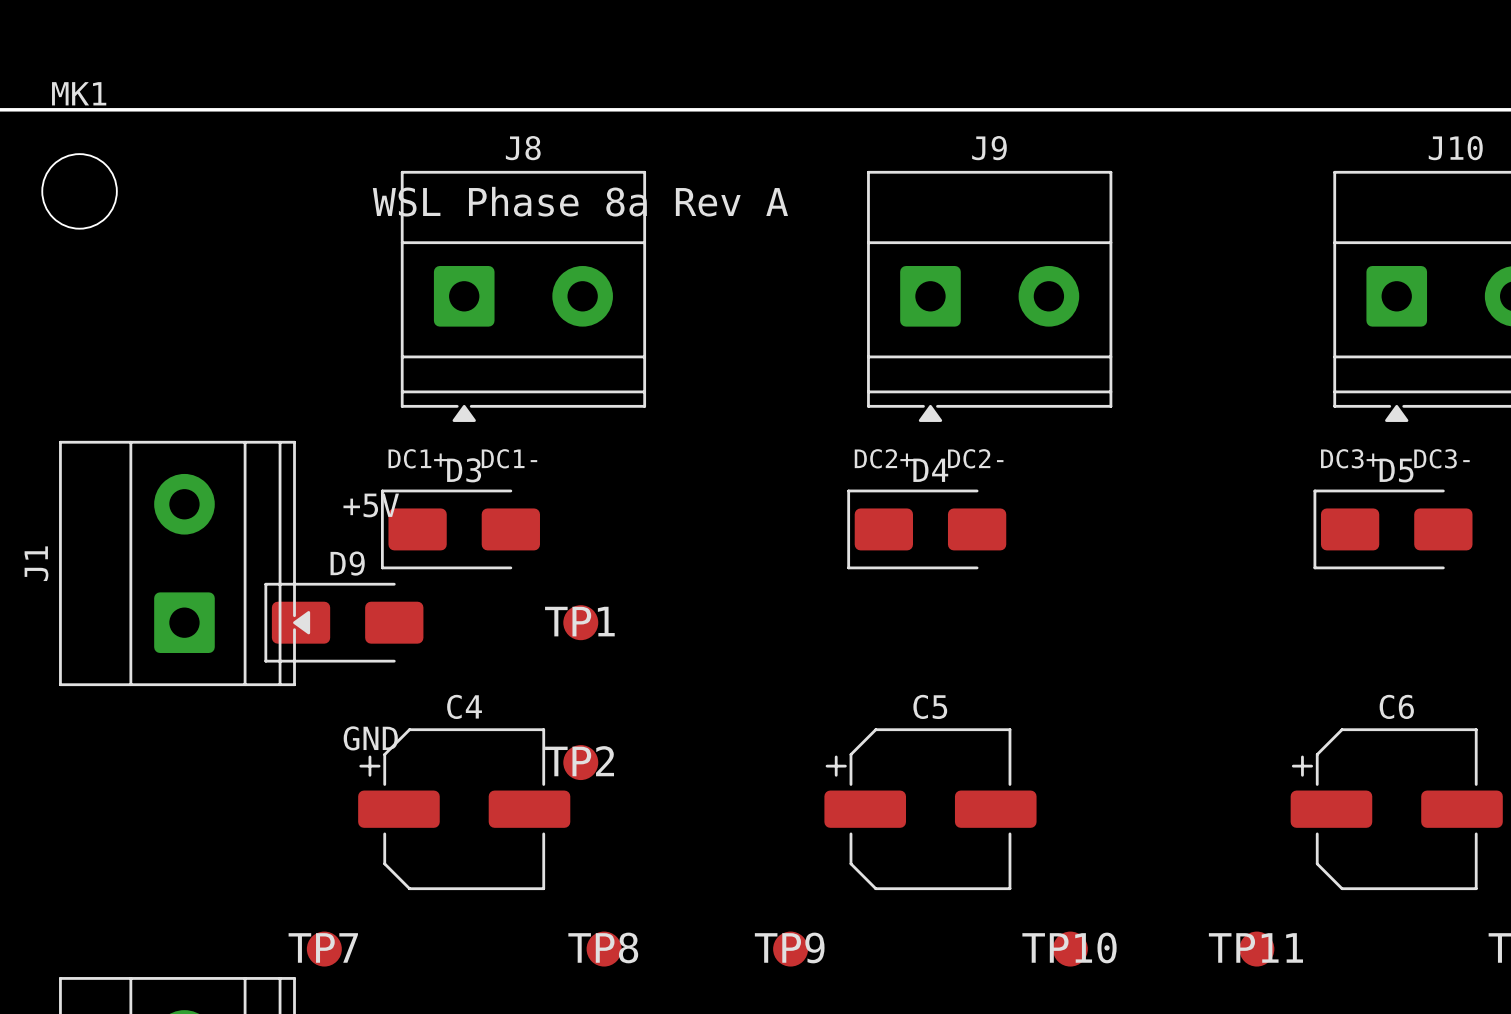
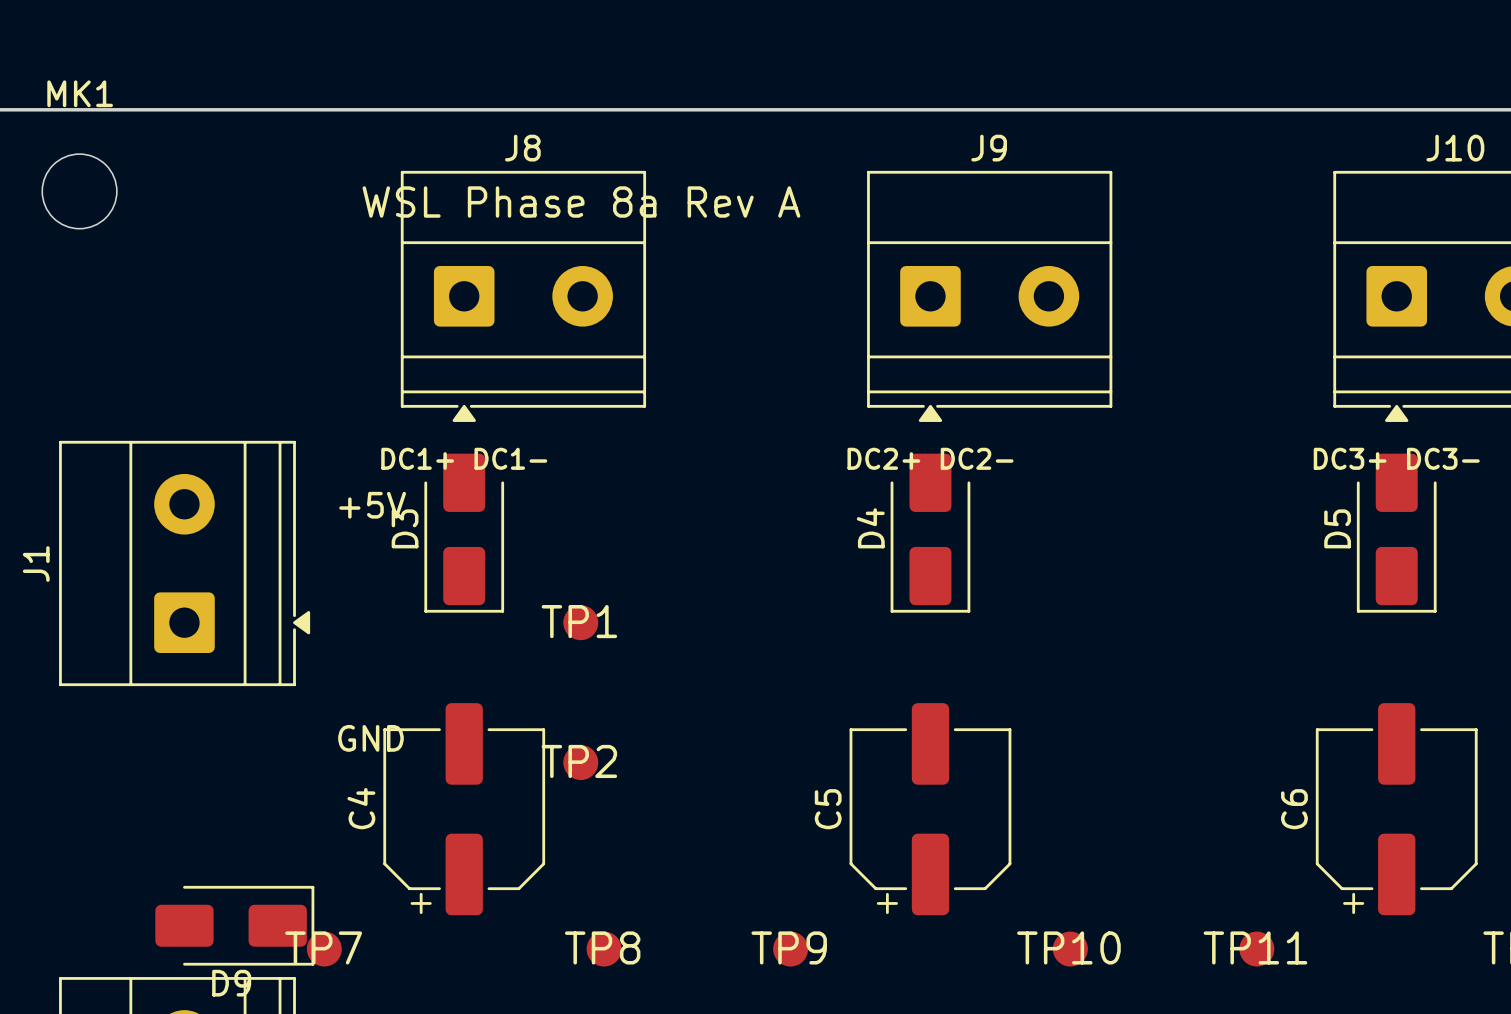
D3 rotation: 0° (460, 529) -> 90° counterclockwise (464, 533)
D4 rotation: 0° (926, 529) -> 90° counterclockwise (930, 533)
D5 rotation: 0° (1393, 529) -> 90° counterclockwise (1396, 533)
D9 rotation: 0° (343, 622) -> 180° (234, 925)
D9 position: (343, 622) -> (234, 925)
C4 rotation: 0° (464, 809) -> 90° counterclockwise (464, 809)
C5 rotation: 0° (930, 809) -> 90° counterclockwise (930, 809)
C6 rotation: 0° (1396, 809) -> 90° counterclockwise (1396, 809)

